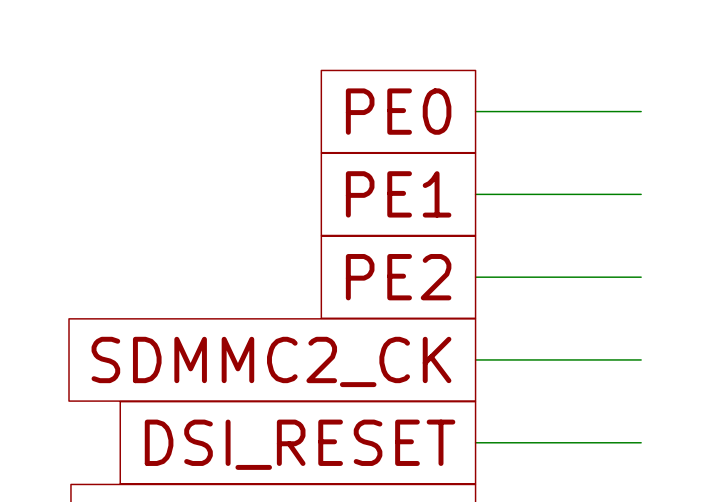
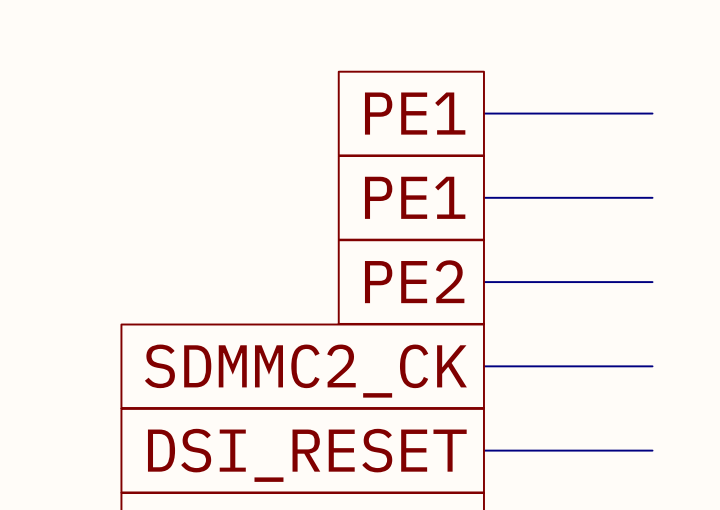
global label: PE0 (398, 111) -> PE1 (415, 113)

